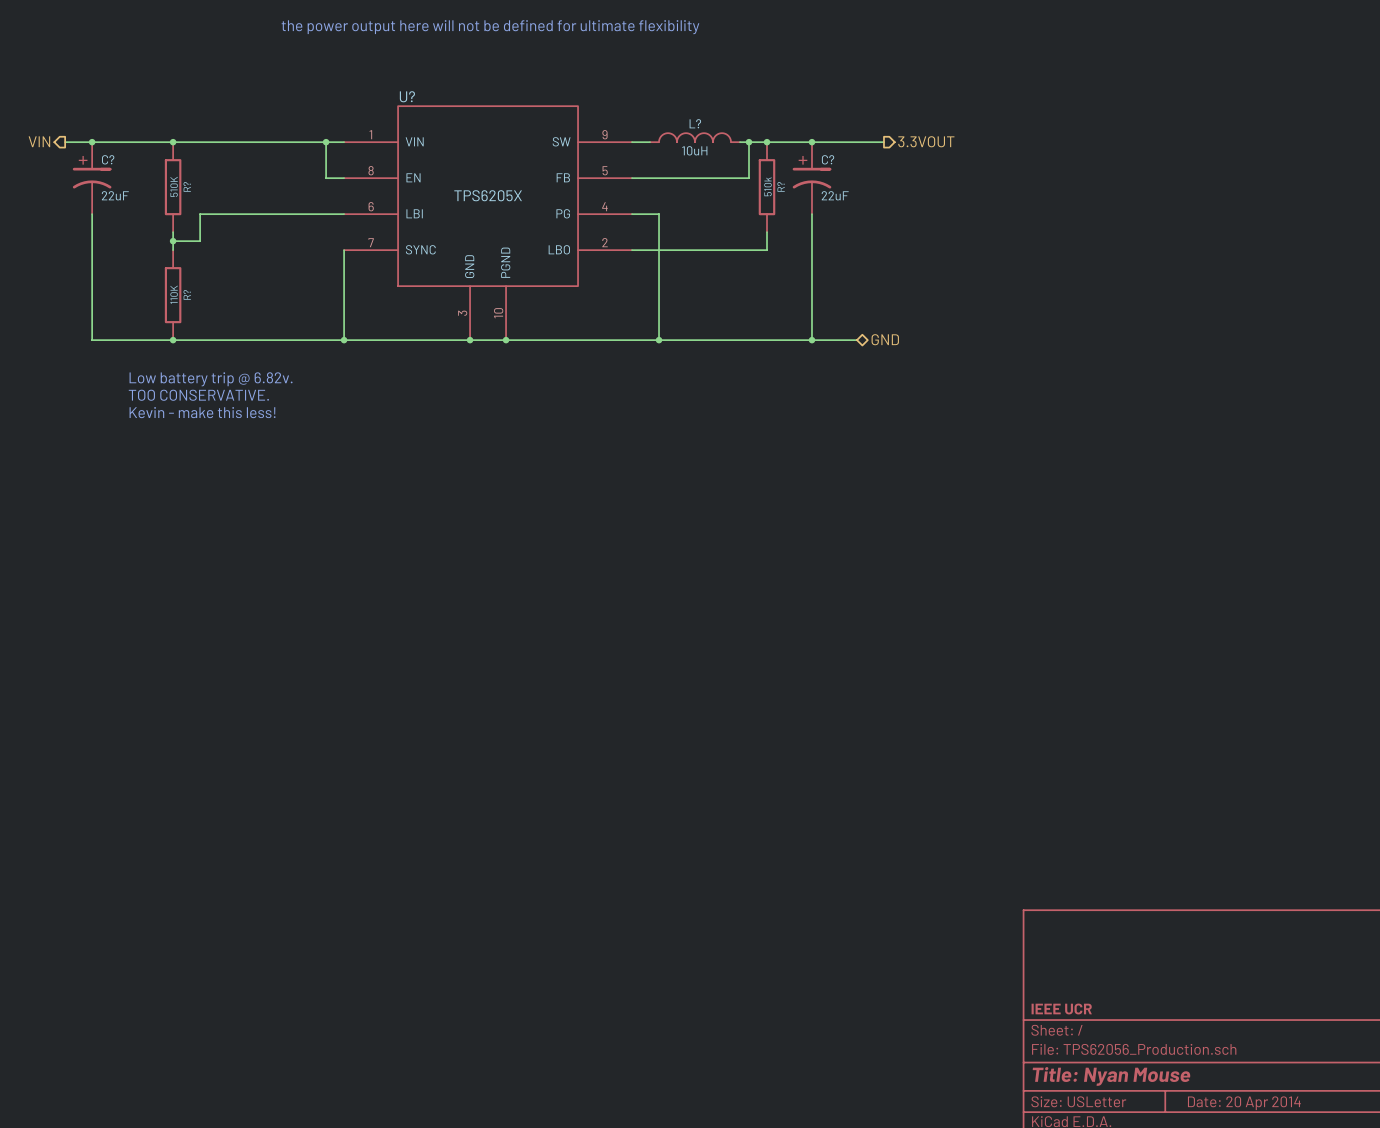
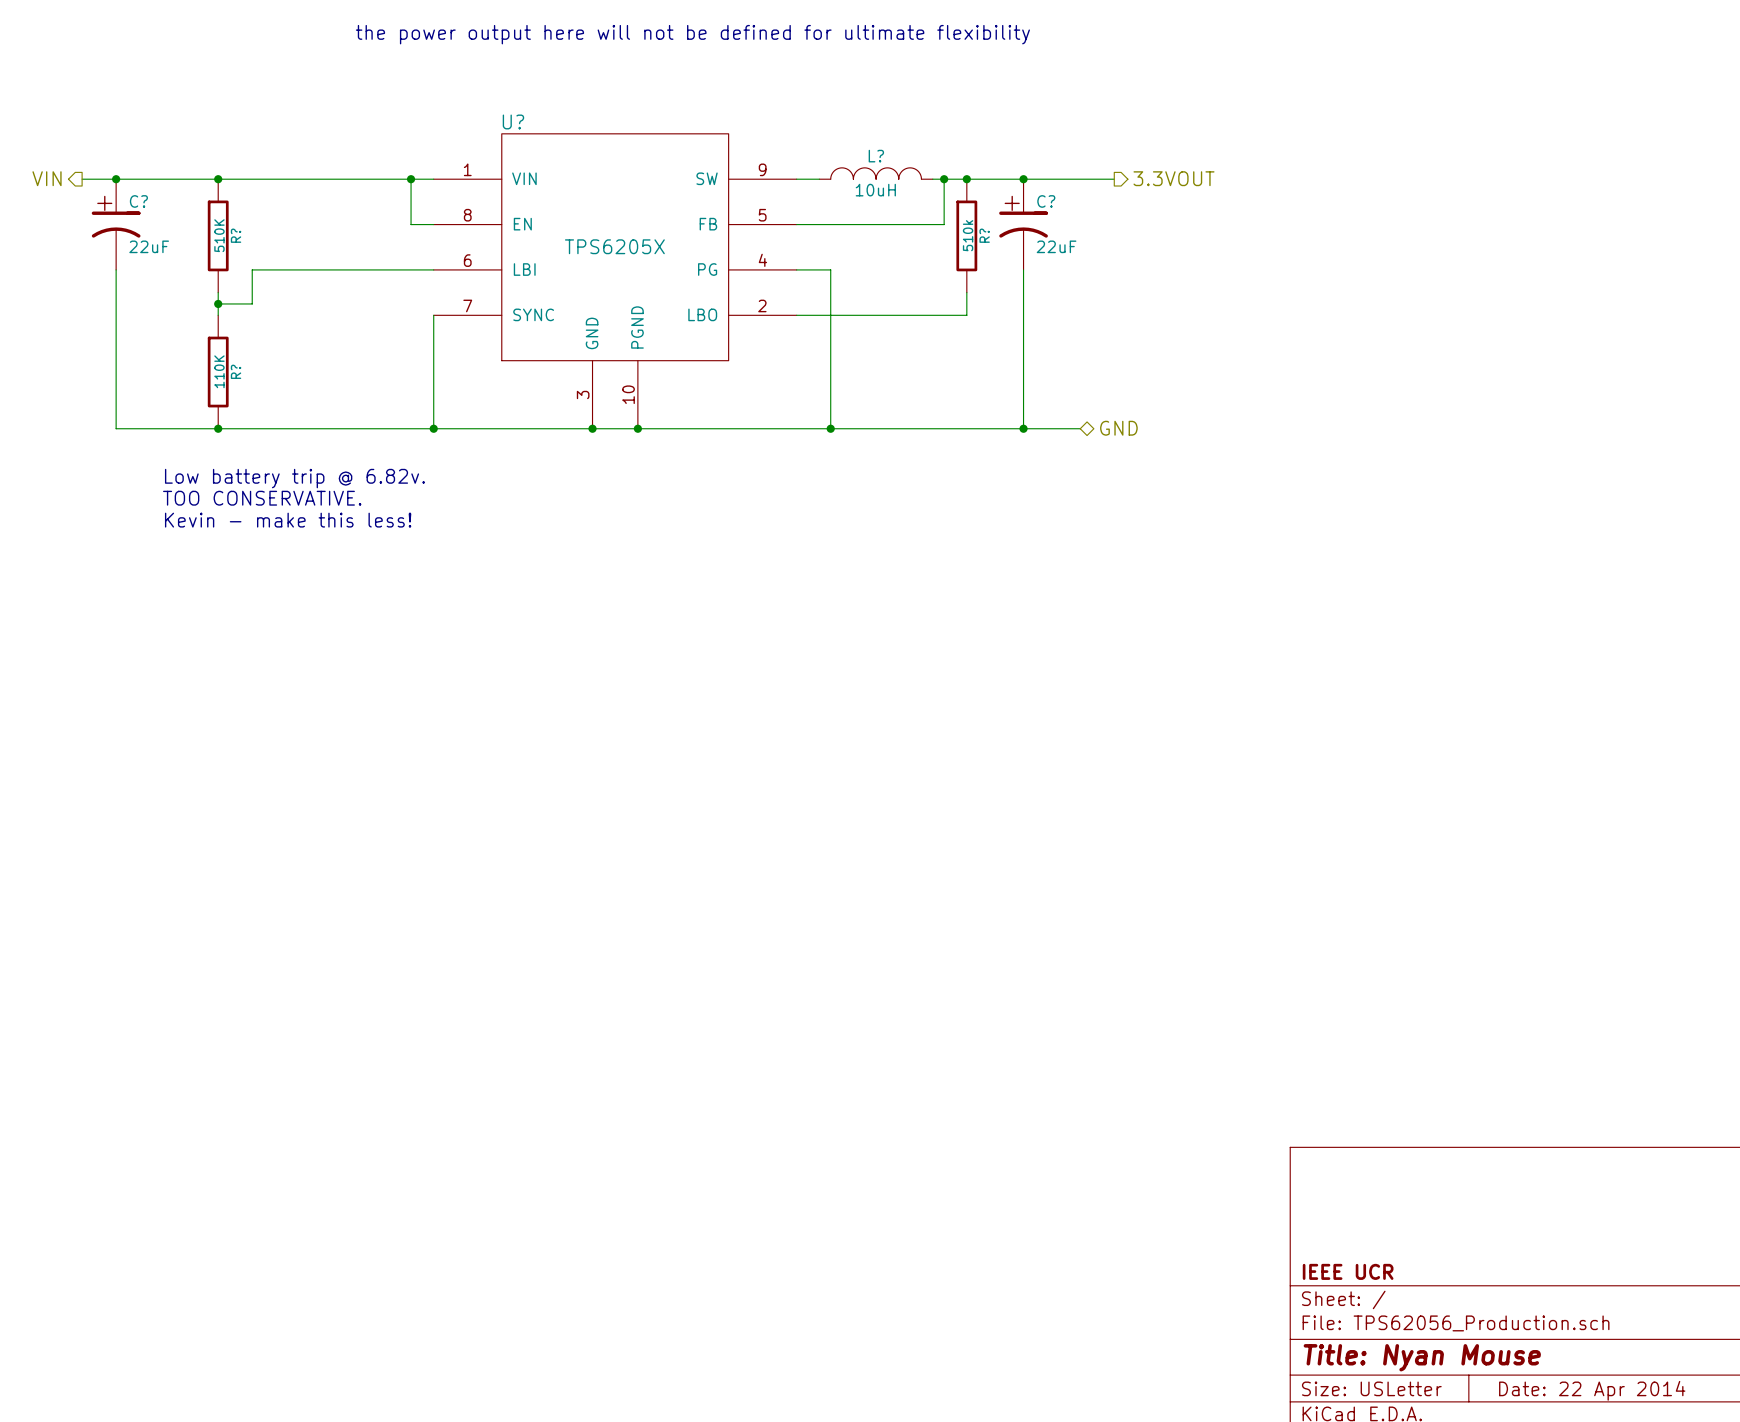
title block: Date: 20 Apr 2014 (1244, 1103) -> Date: 22 Apr 2014 (1592, 1390)

